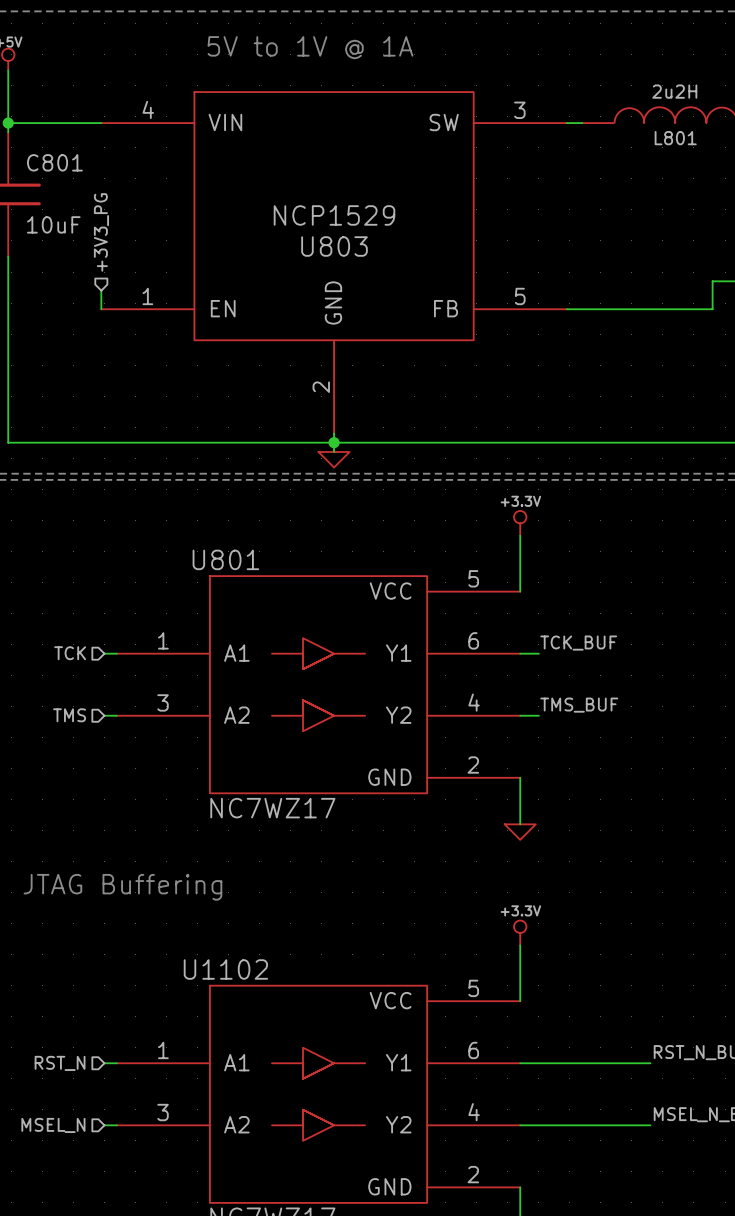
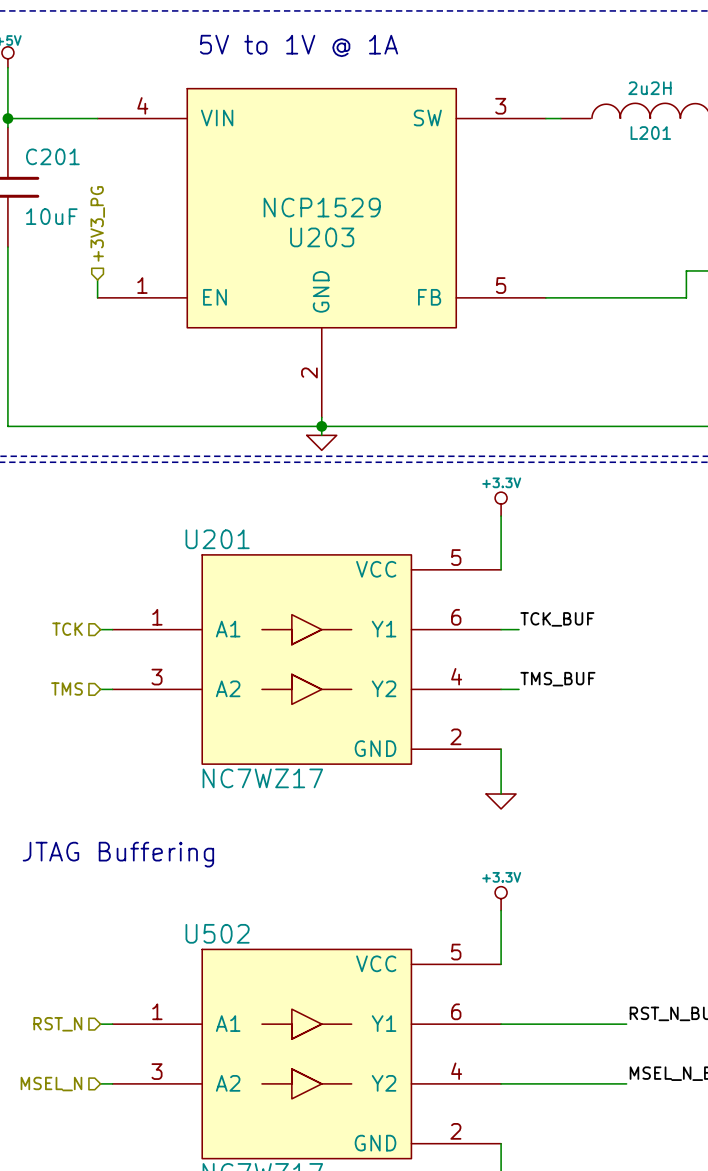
L801 name: L801 (675, 138) -> L201 (650, 133)
C801 name: C801 (54, 162) -> C201 (52, 156)
U803 name: U803 (334, 246) -> U203 (322, 237)
U801 name: U801 (225, 559) -> U201 (217, 539)
U1102 name: U1102 (225, 969) -> U502 (217, 933)

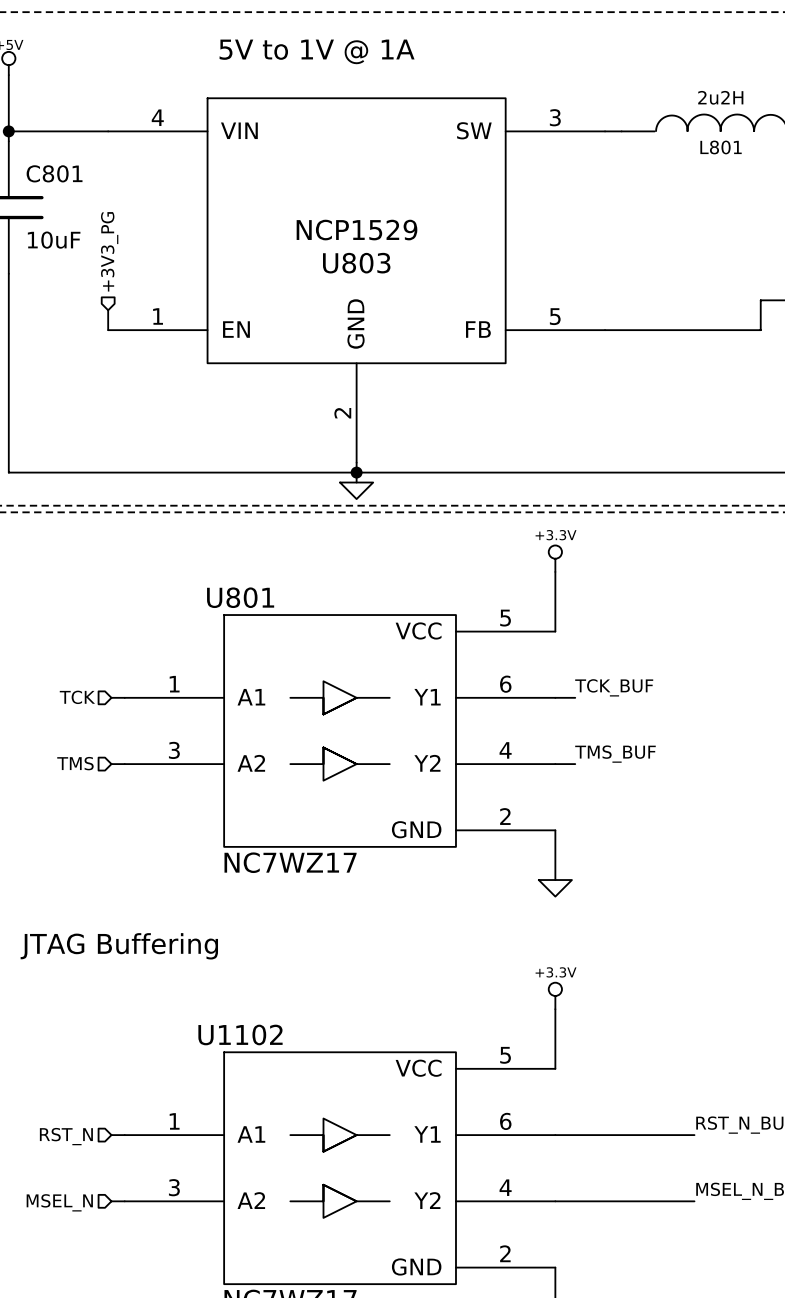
L201 name: L201 (650, 133) -> L801 (721, 147)
C201 name: C201 (52, 156) -> C801 (54, 173)
U203 name: U203 (322, 237) -> U803 (356, 263)
U201 name: U201 (217, 539) -> U801 (240, 597)
U502 name: U502 (217, 933) -> U1102 (240, 1034)

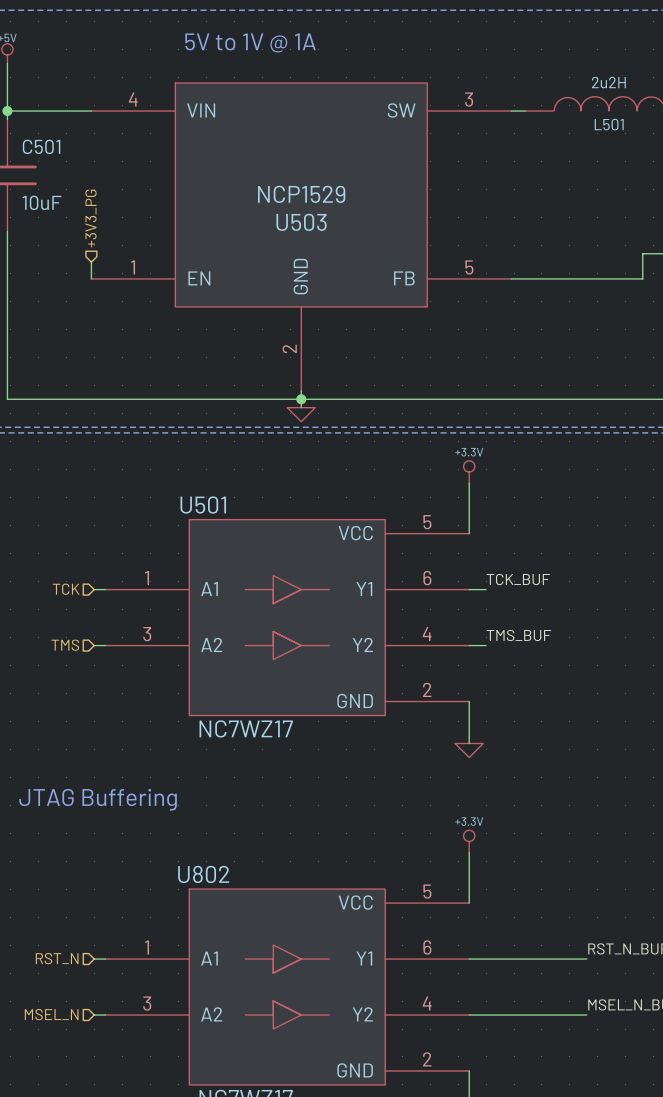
L801 name: L801 (721, 147) -> L501 (609, 124)
C801 name: C801 (54, 173) -> C501 (41, 146)
U803 name: U803 (356, 263) -> U503 (301, 222)
U801 name: U801 (240, 597) -> U501 (203, 505)
U1102 name: U1102 (240, 1034) -> U802 (203, 874)

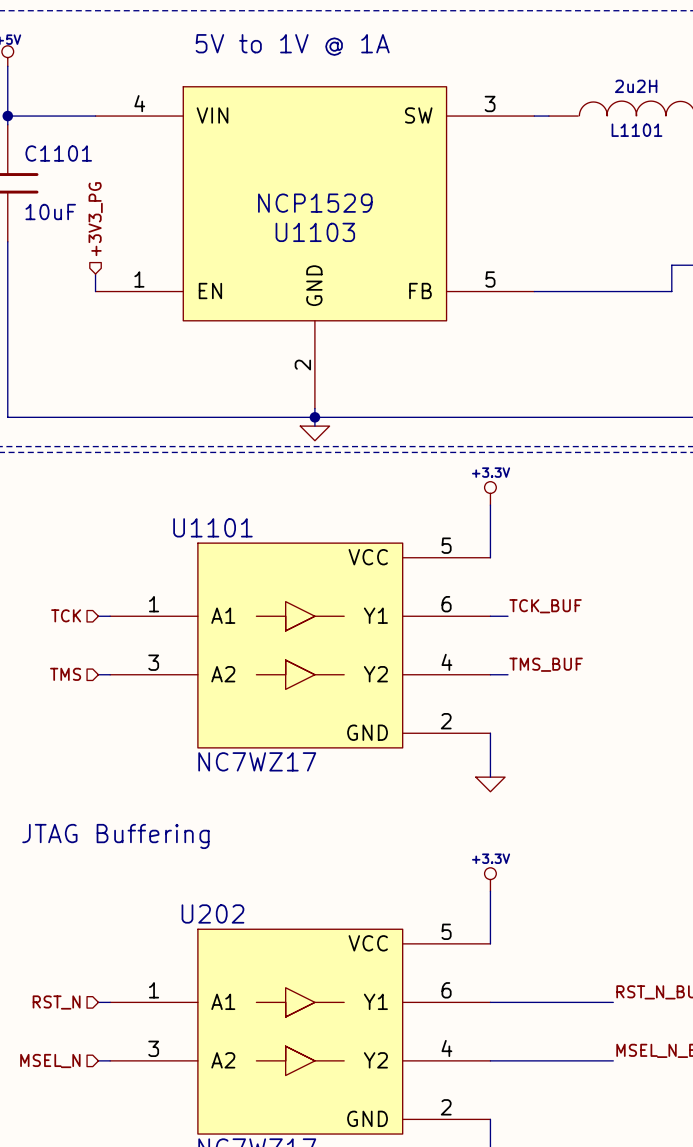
L501 name: L501 (609, 124) -> L1101 (636, 130)
C501 name: C501 (41, 146) -> C1101 (58, 153)
U503 name: U503 (301, 222) -> U1103 (315, 232)
U501 name: U501 (203, 505) -> U1101 (212, 527)
U802 name: U802 (203, 874) -> U202 (212, 913)

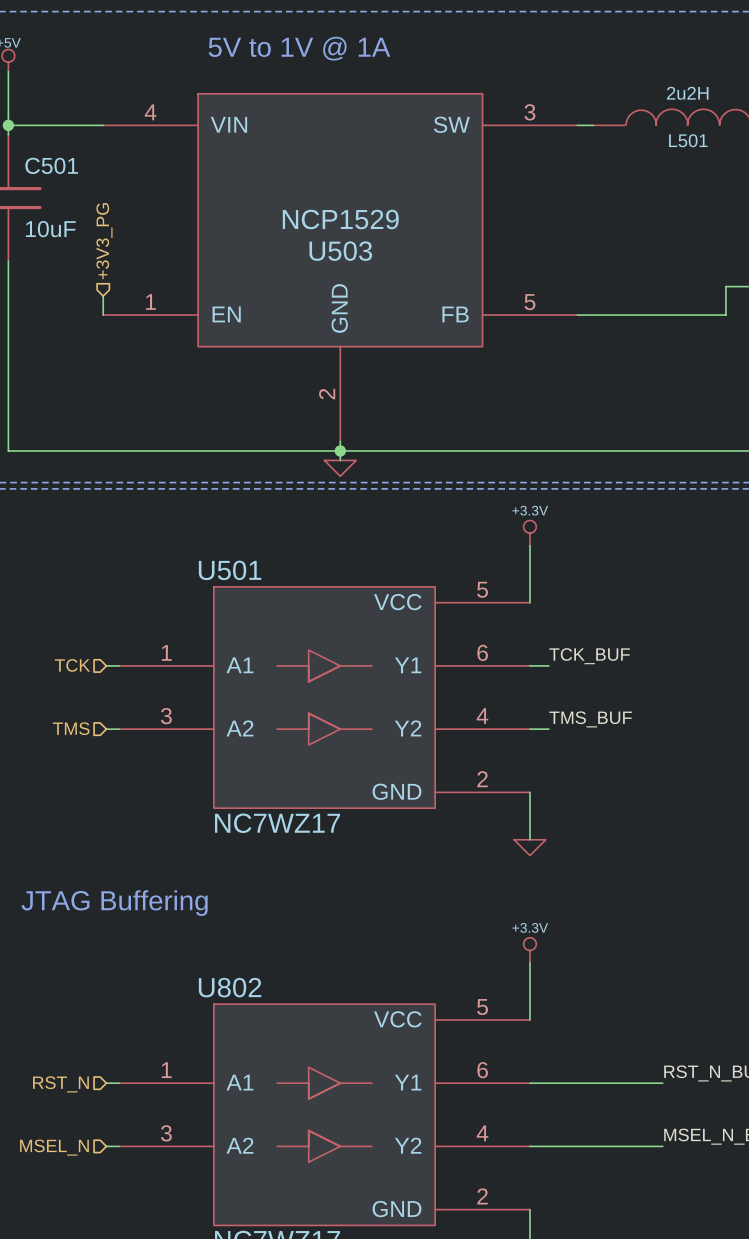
L1101 name: L1101 (636, 130) -> L501 (688, 140)
C1101 name: C1101 (58, 153) -> C501 (51, 165)
U1103 name: U1103 (315, 232) -> U503 (340, 251)
U1101 name: U1101 (212, 527) -> U501 (230, 570)
U202 name: U202 (212, 913) -> U802 (230, 987)

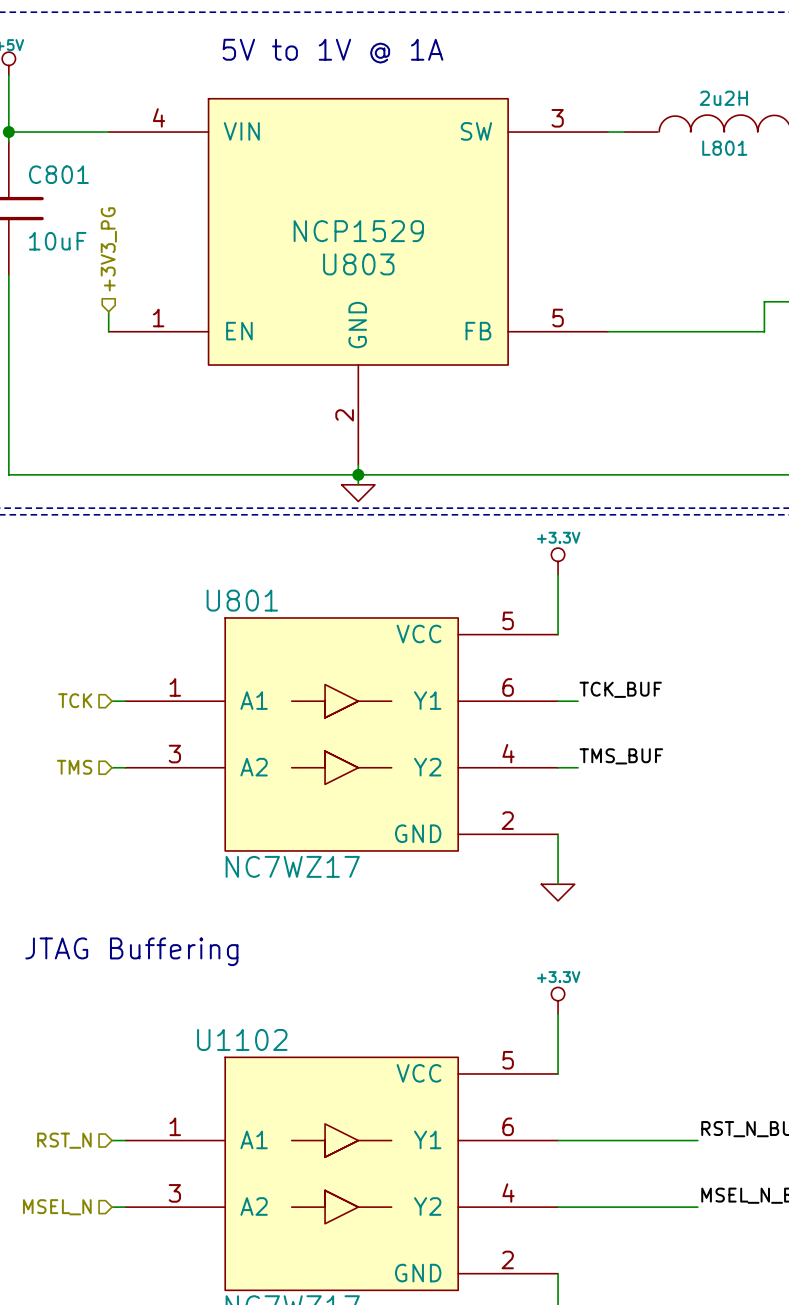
L501 name: L501 (688, 140) -> L801 (724, 148)
C501 name: C501 (51, 165) -> C801 (58, 174)
U503 name: U503 (340, 251) -> U803 (358, 264)
U501 name: U501 (230, 570) -> U801 (242, 600)
U802 name: U802 (230, 987) -> U1102 (242, 1039)

